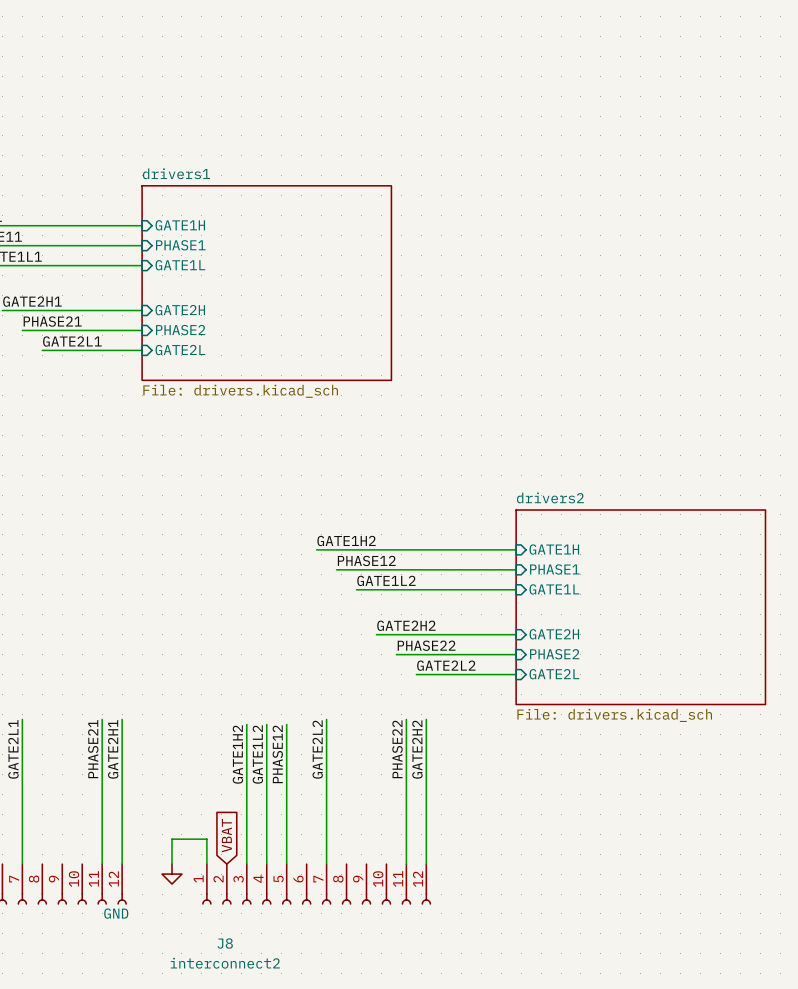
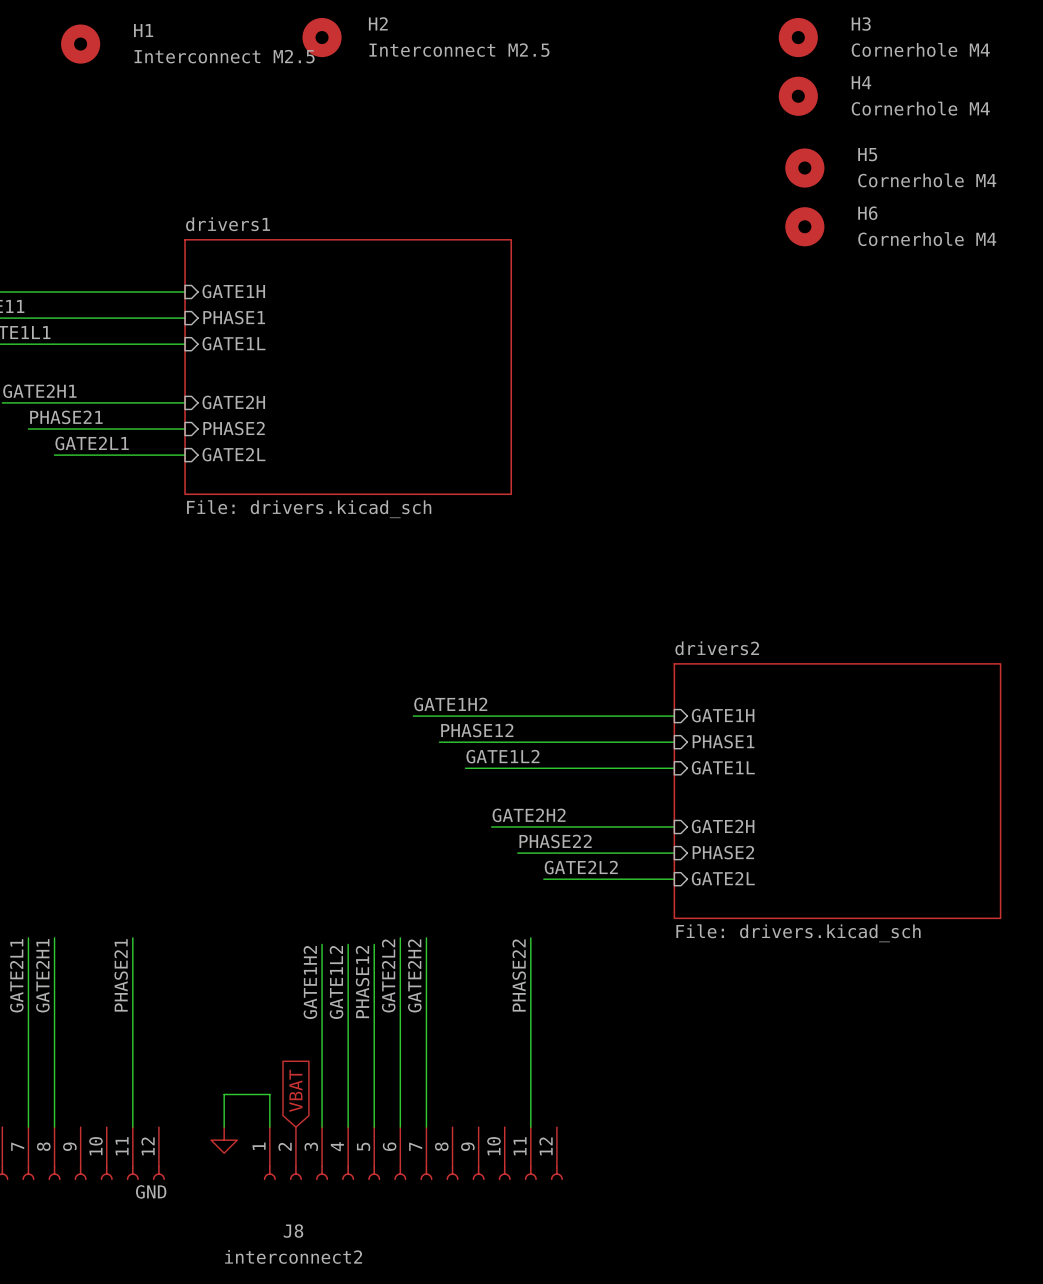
H2: none -> Interconnect M2.5 (322, 37)
H3: none -> Cornerhole M4 (798, 37)
H1: none -> Interconnect M2.5 (80, 44)
H4: none -> Cornerhole M4 (798, 96)
H5: none -> Cornerhole M4 (804, 168)
H6: none -> Cornerhole M4 (804, 226)
wire: (122, 719) (122, 864) -> (54, 937) (54, 1127)
wire: (426, 719) (426, 864) -> (400, 937) (400, 1127)
label position: GATE2H1 (113, 749) -> GATE2H1 (42, 975)
label: none -> GATE2L2 (388, 975)
label: GATE2L2 (317, 749) -> GATE2H2 (414, 975)
label: GATE2H2 (417, 749) -> none

